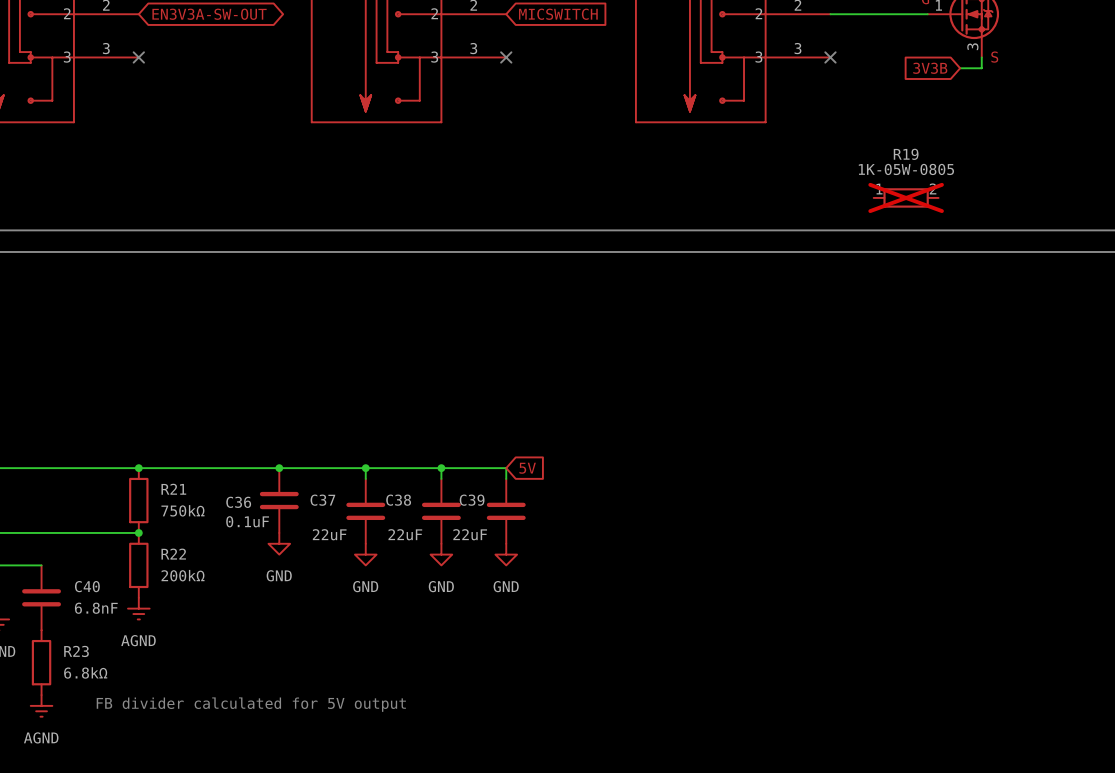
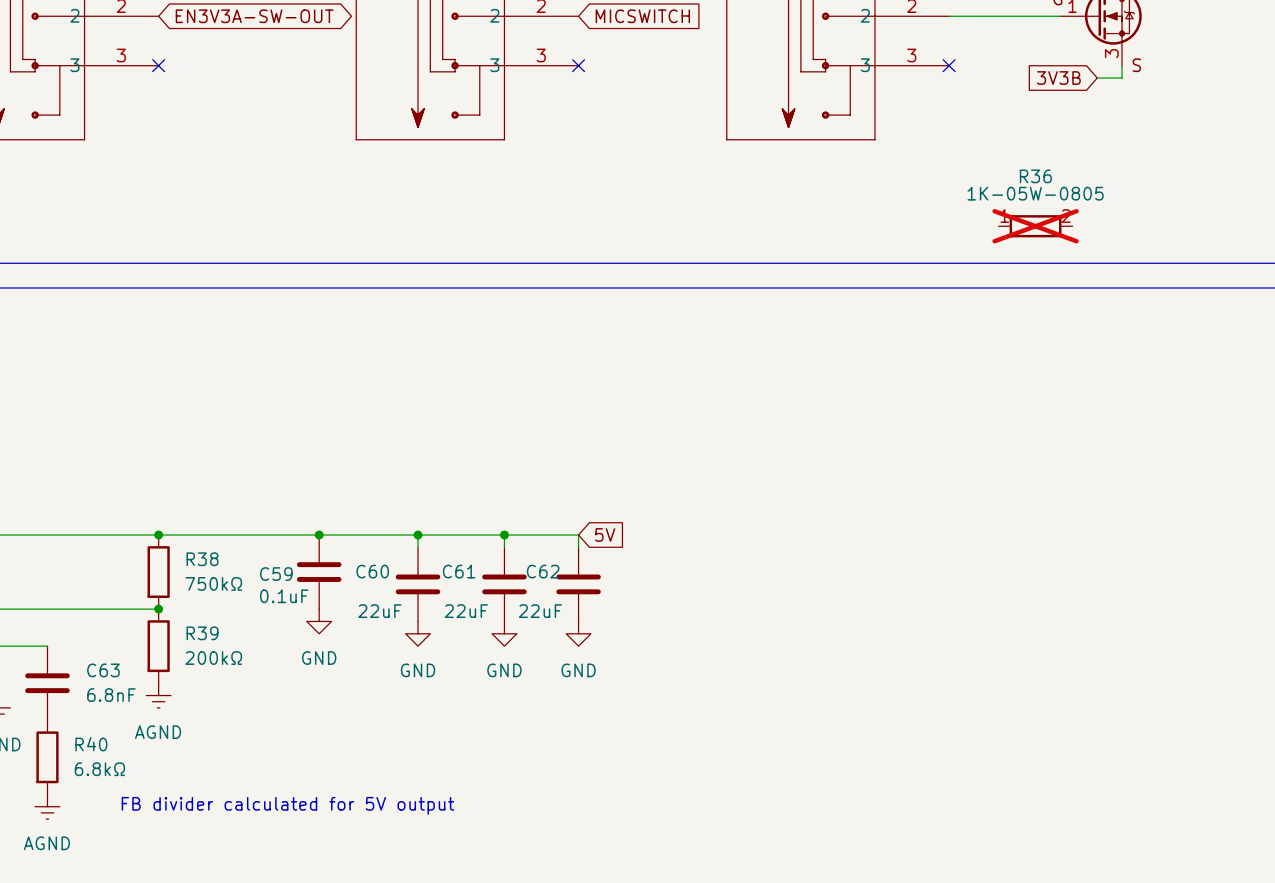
R19 name: R19 (906, 154) -> R36 (1035, 176)
R21 name: R21 (173, 489) -> R38 (202, 559)
C37 name: C37 (322, 500) -> C60 (372, 571)
C38 name: C38 (398, 500) -> C61 (459, 571)
C39 name: C39 (472, 500) -> C62 (543, 571)
C36 name: C36 (238, 502) -> C59 (276, 574)
R22 name: R22 (173, 554) -> R39 (202, 633)
C40 name: C40 (87, 586) -> C63 (103, 670)
R23 name: R23 (76, 651) -> R40 (91, 744)

